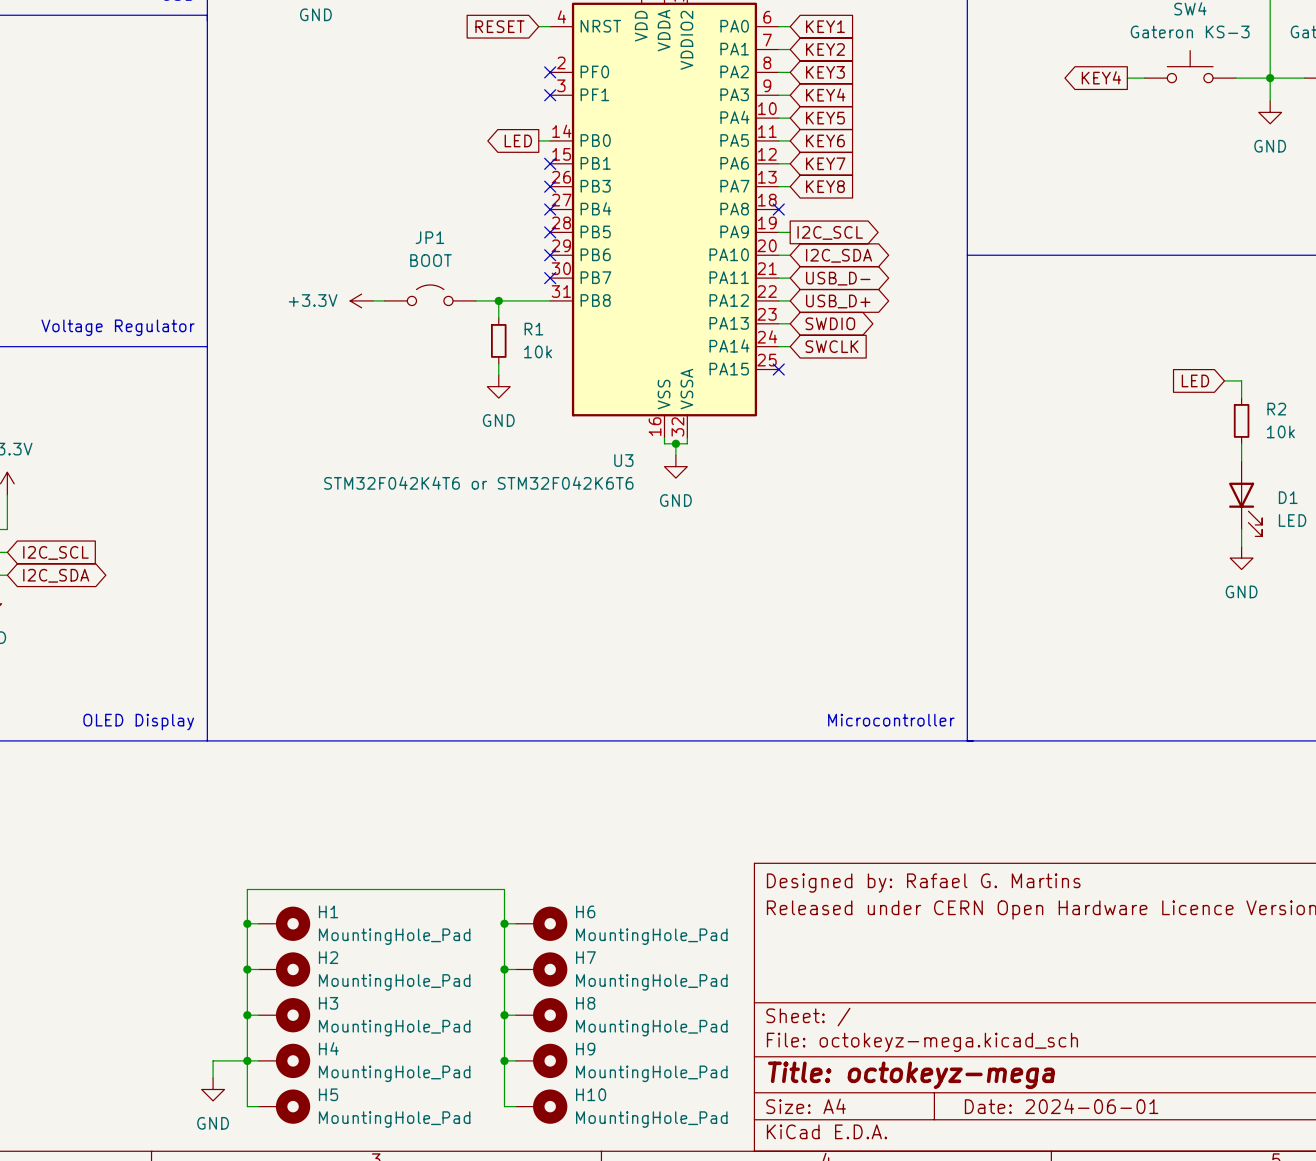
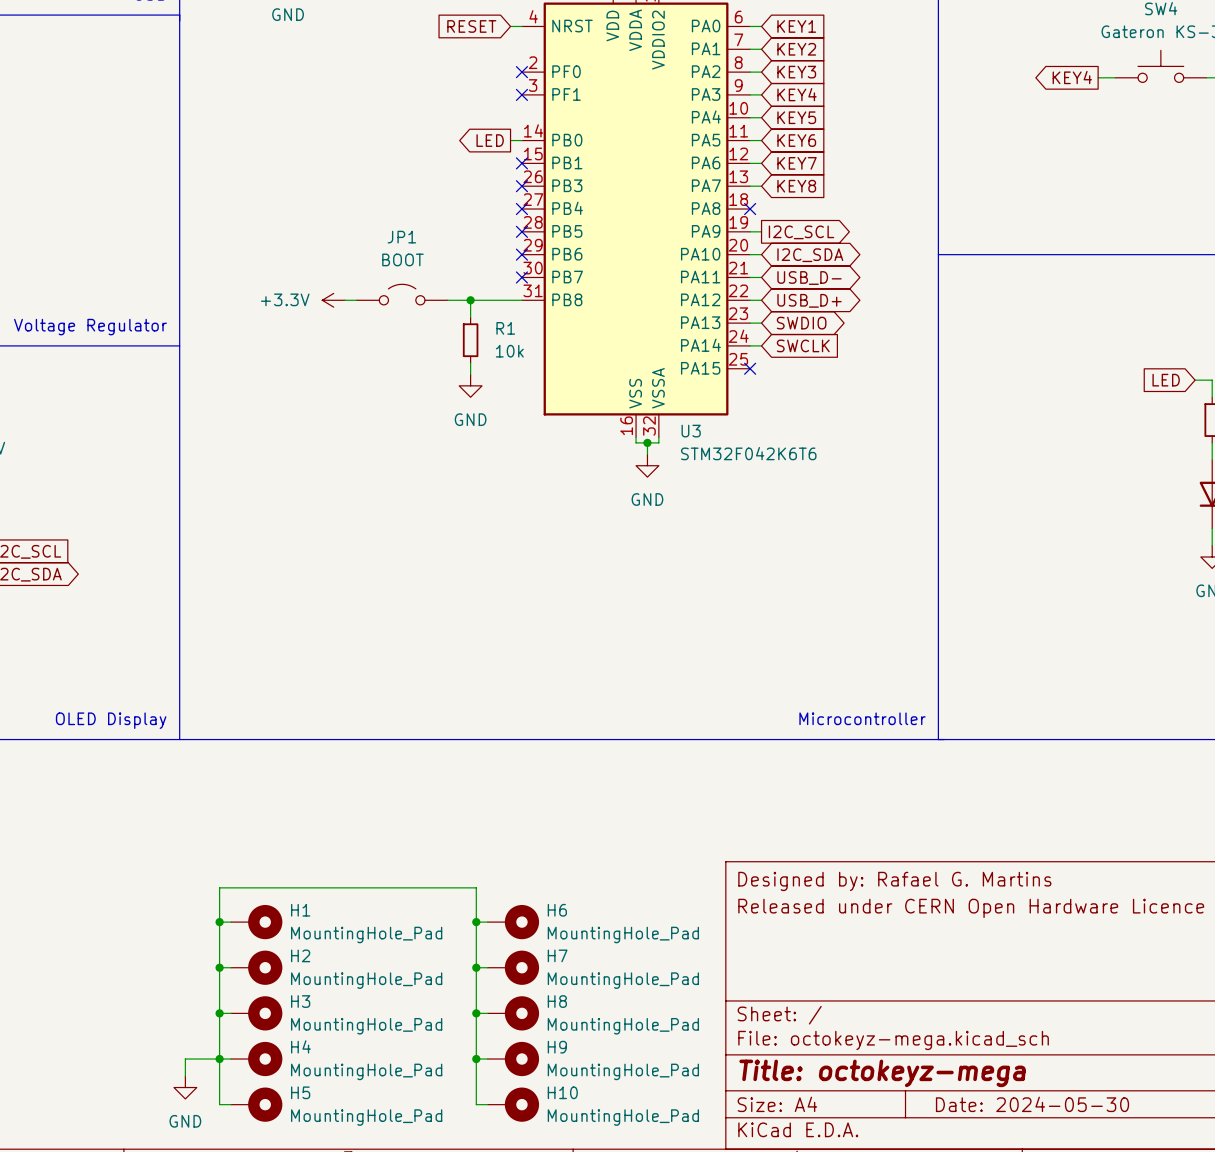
U3 name position: U3 (623, 460) -> U3 (691, 431)
U3 value: STM32F042K4T6 or STM32F042K6T6 (478, 483) -> STM32F042K6T6 (748, 453)
title block: Date: 2024-06-01 (1061, 1106) -> Date: 2024-05-30 (1032, 1104)

